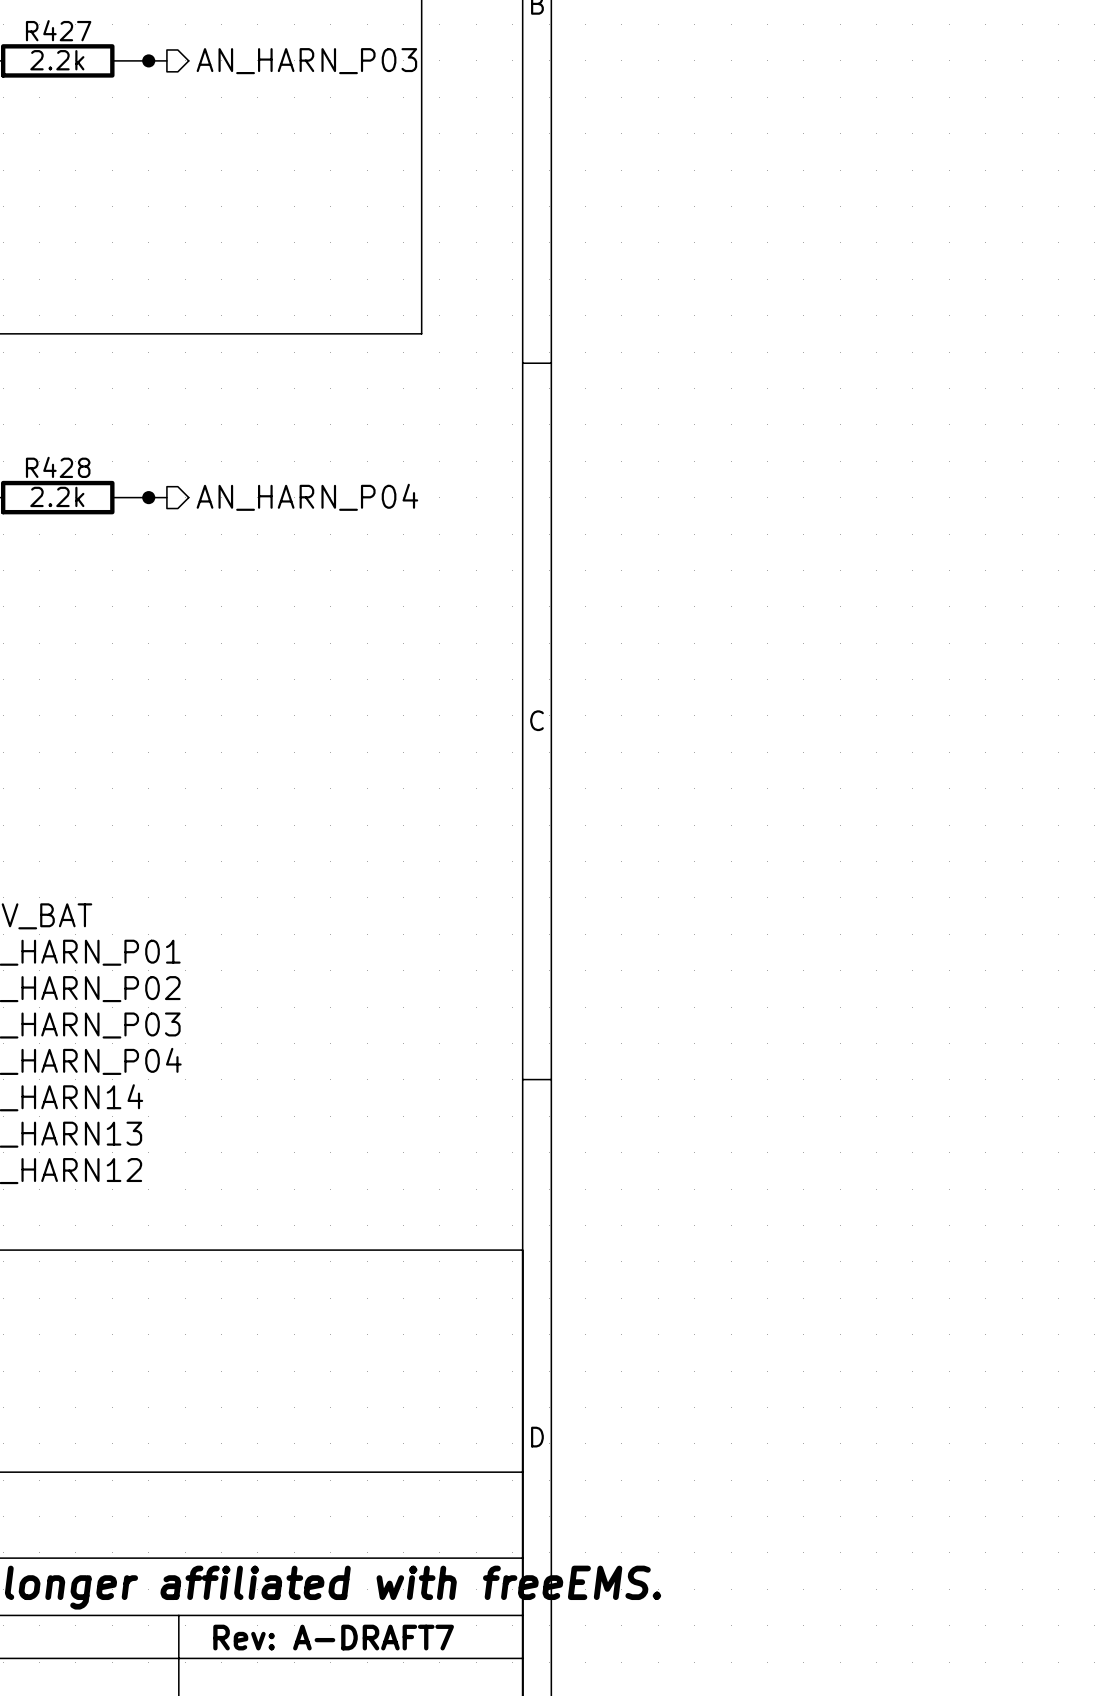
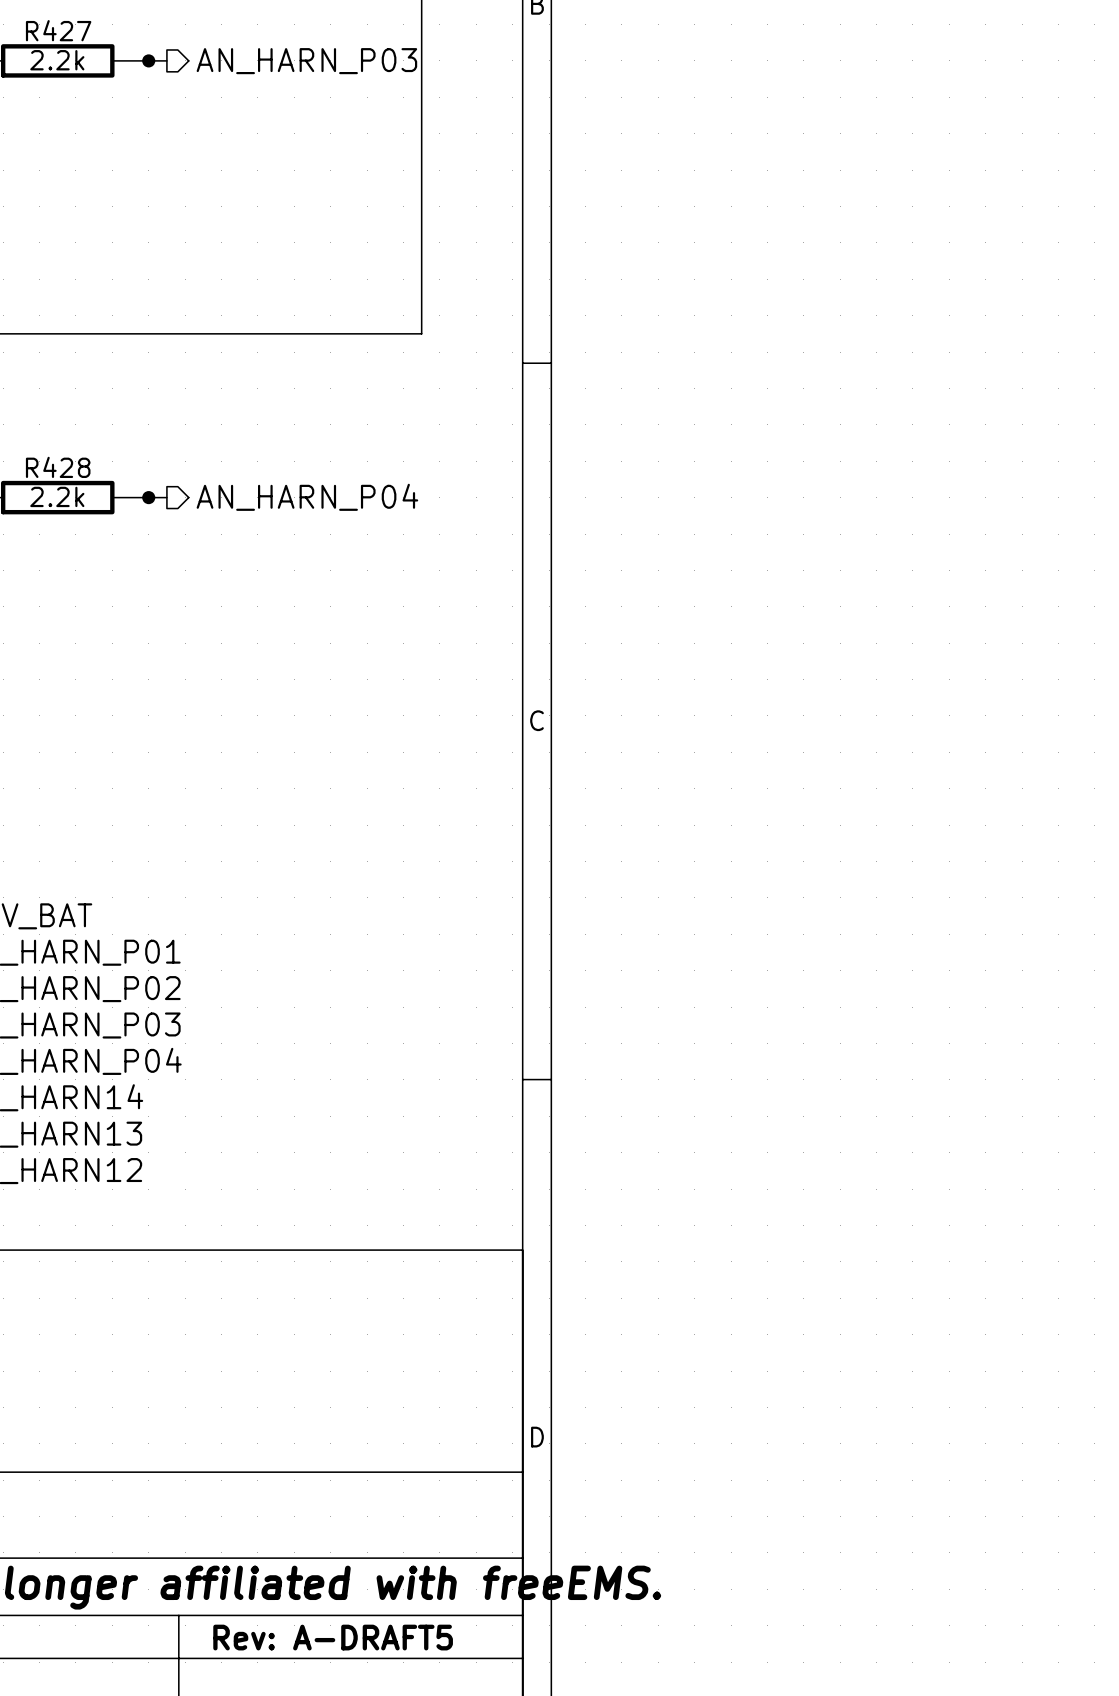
title block: Rev: A-DRAFT7 (333, 1637) -> Rev: A-DRAFT5 (333, 1637)

